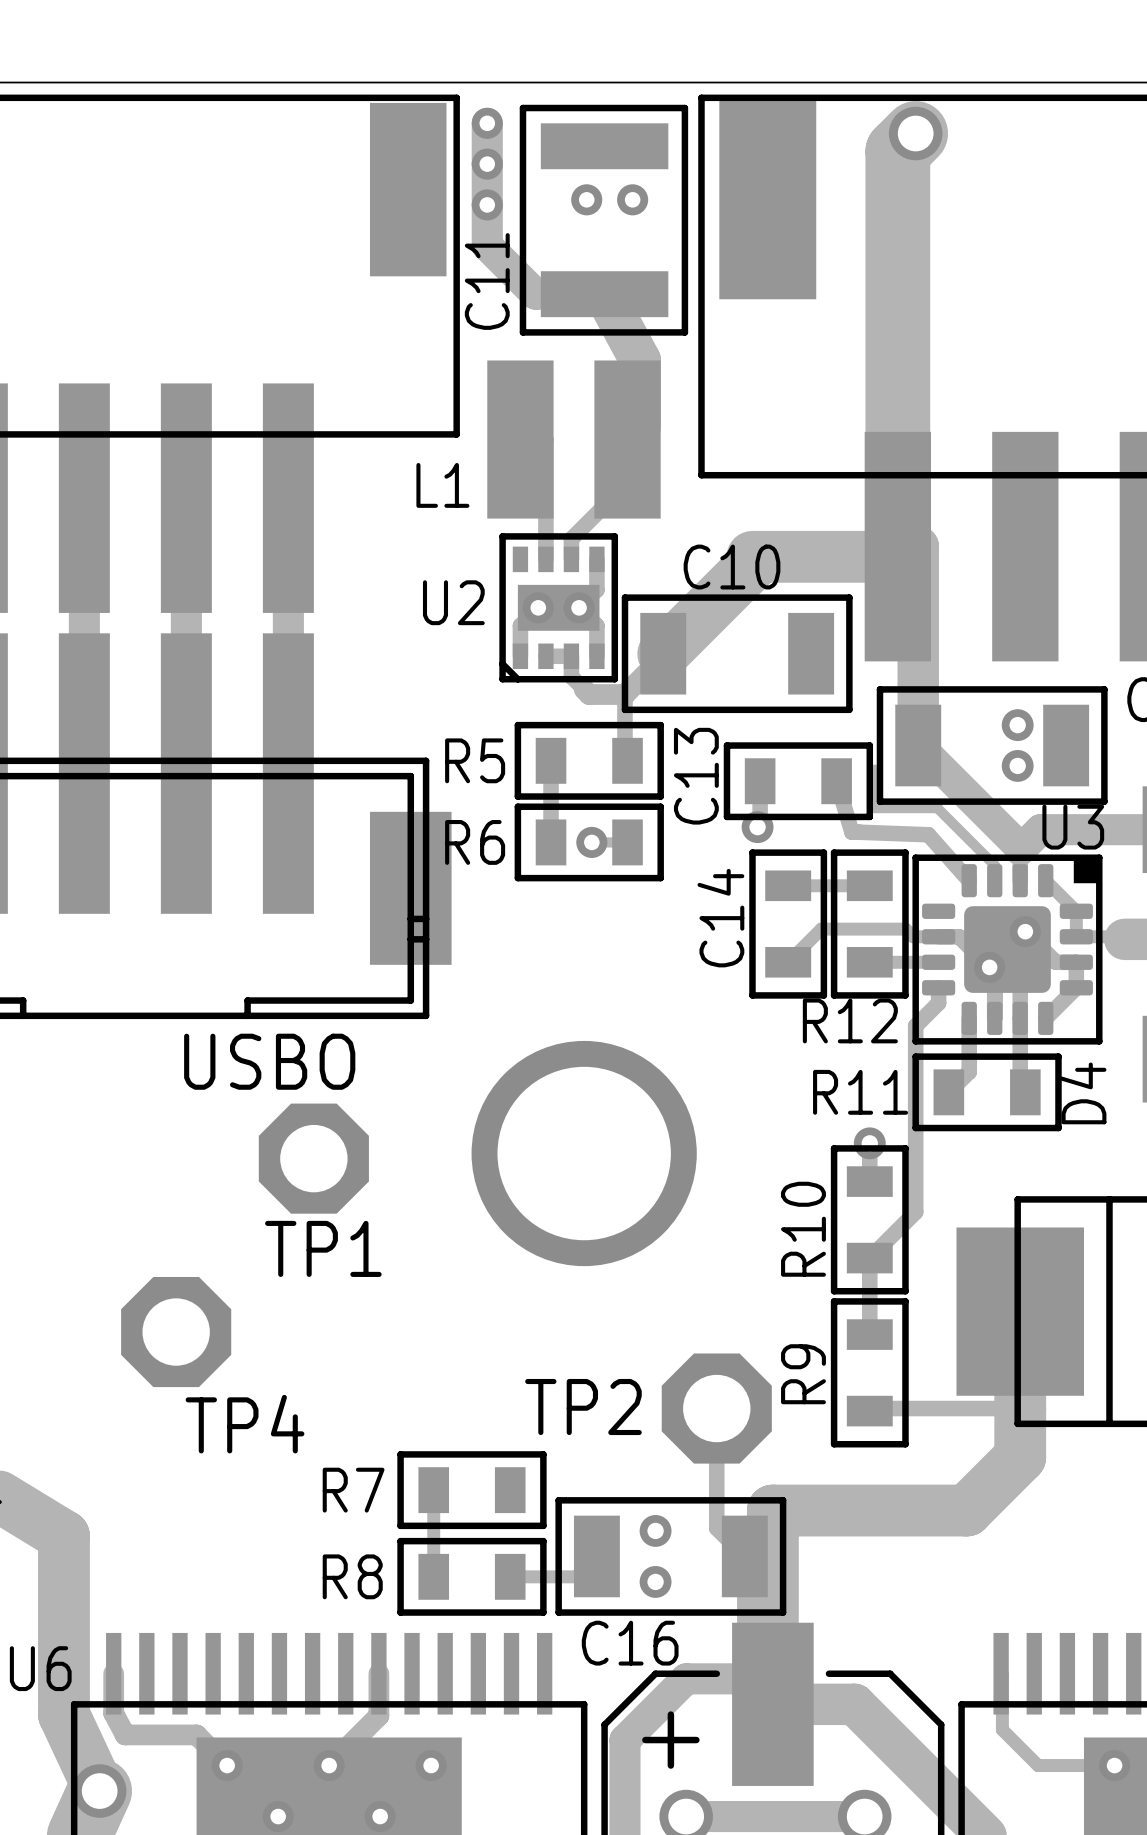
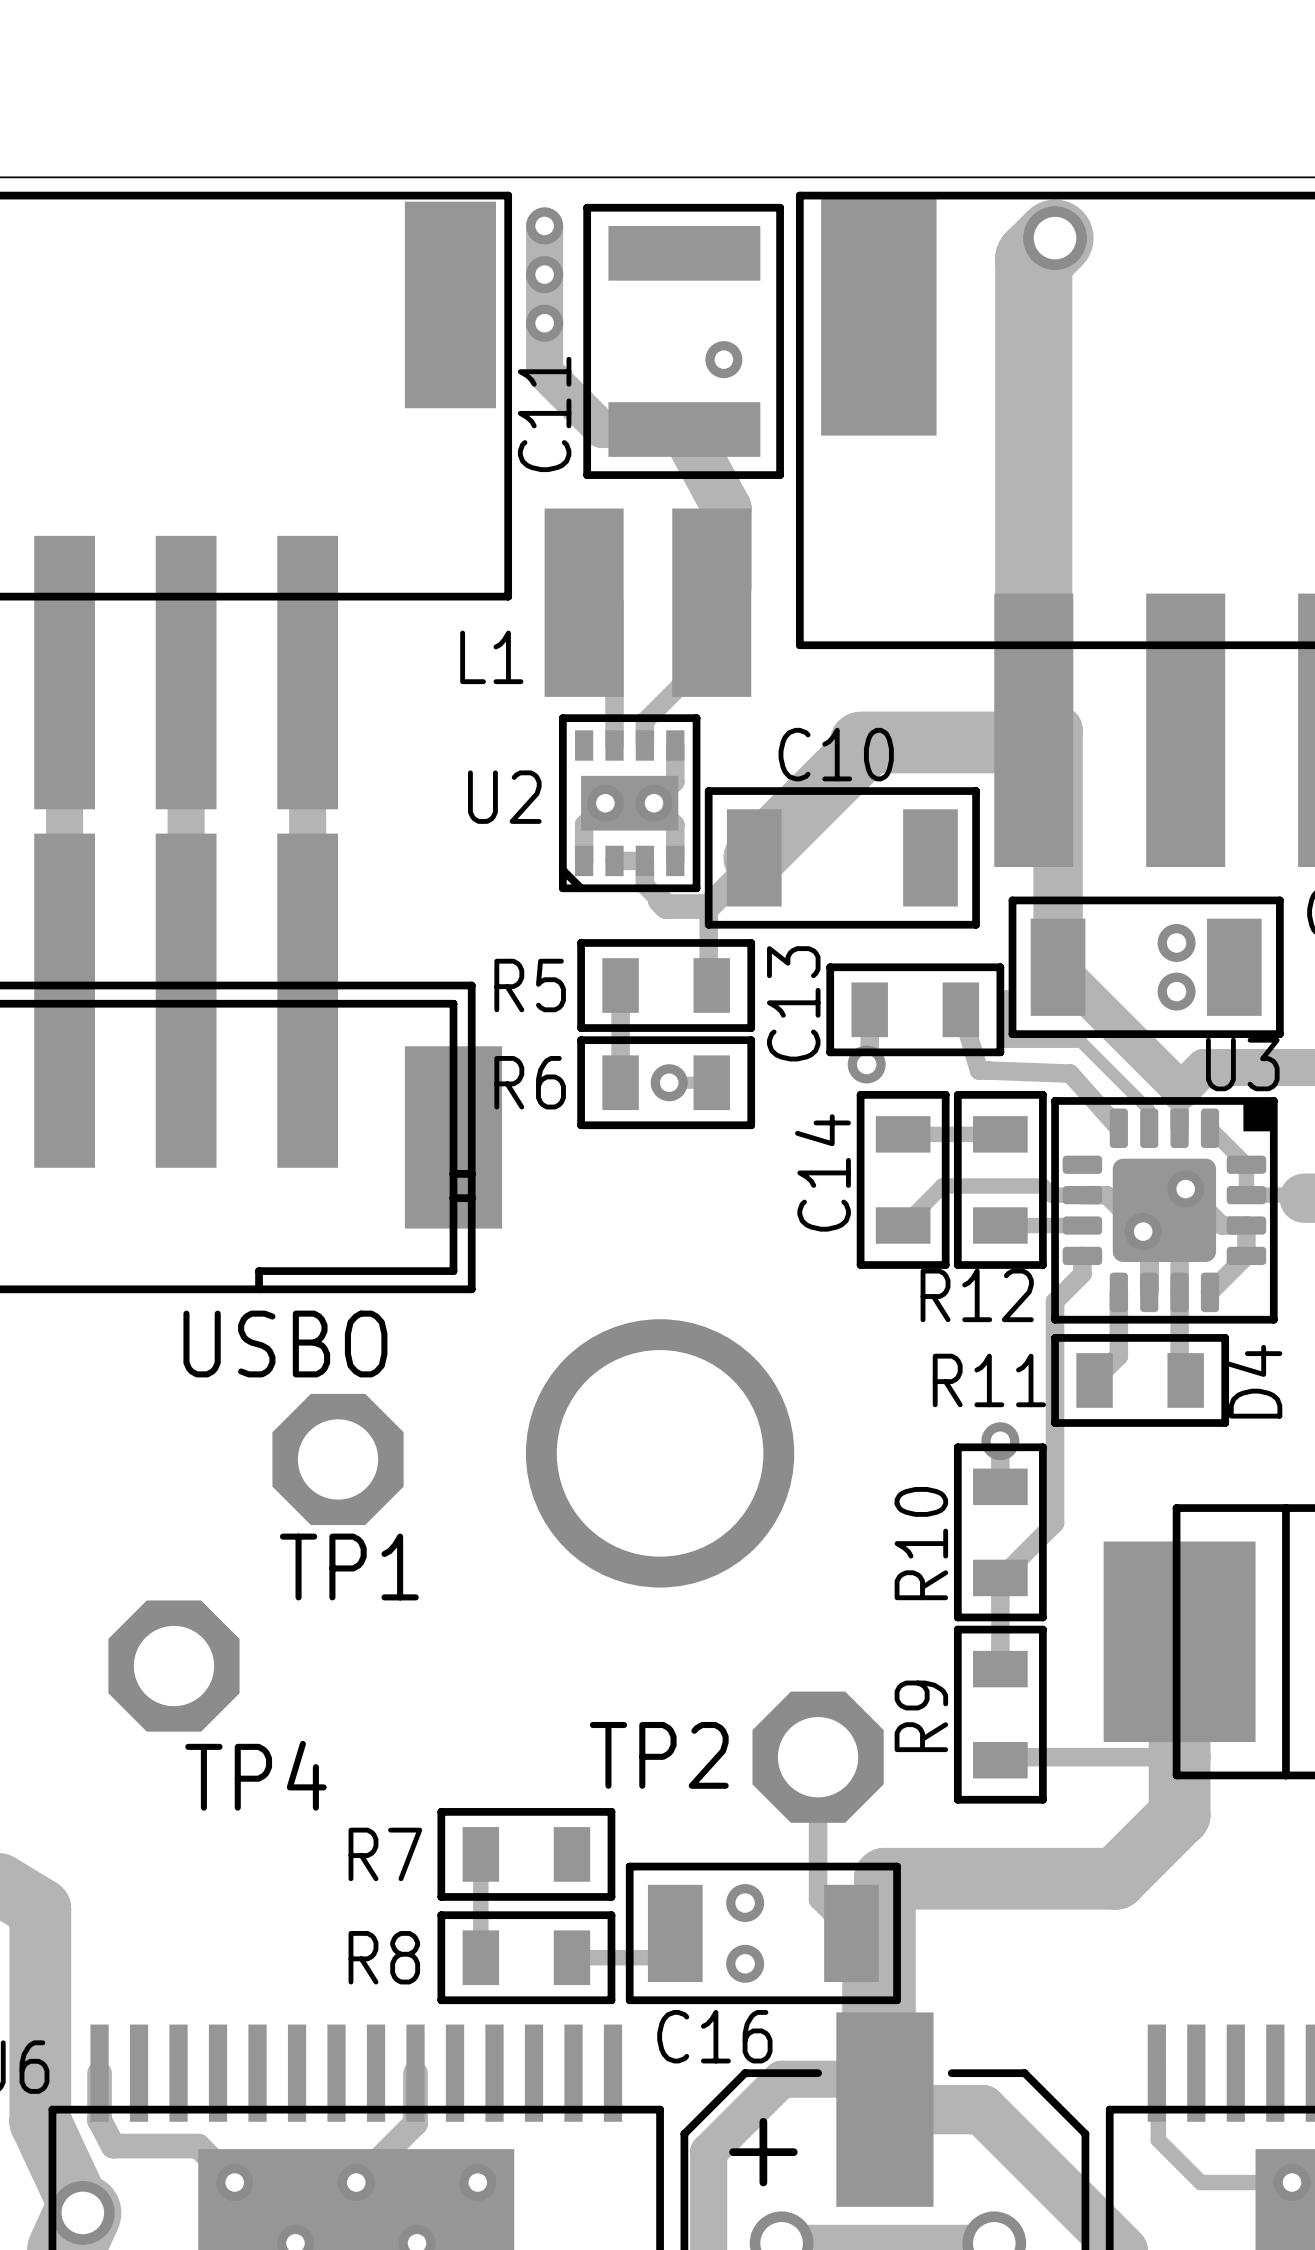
via: (586, 199) -> none
via: (632, 199) -> none
via: none -> (723, 359)

